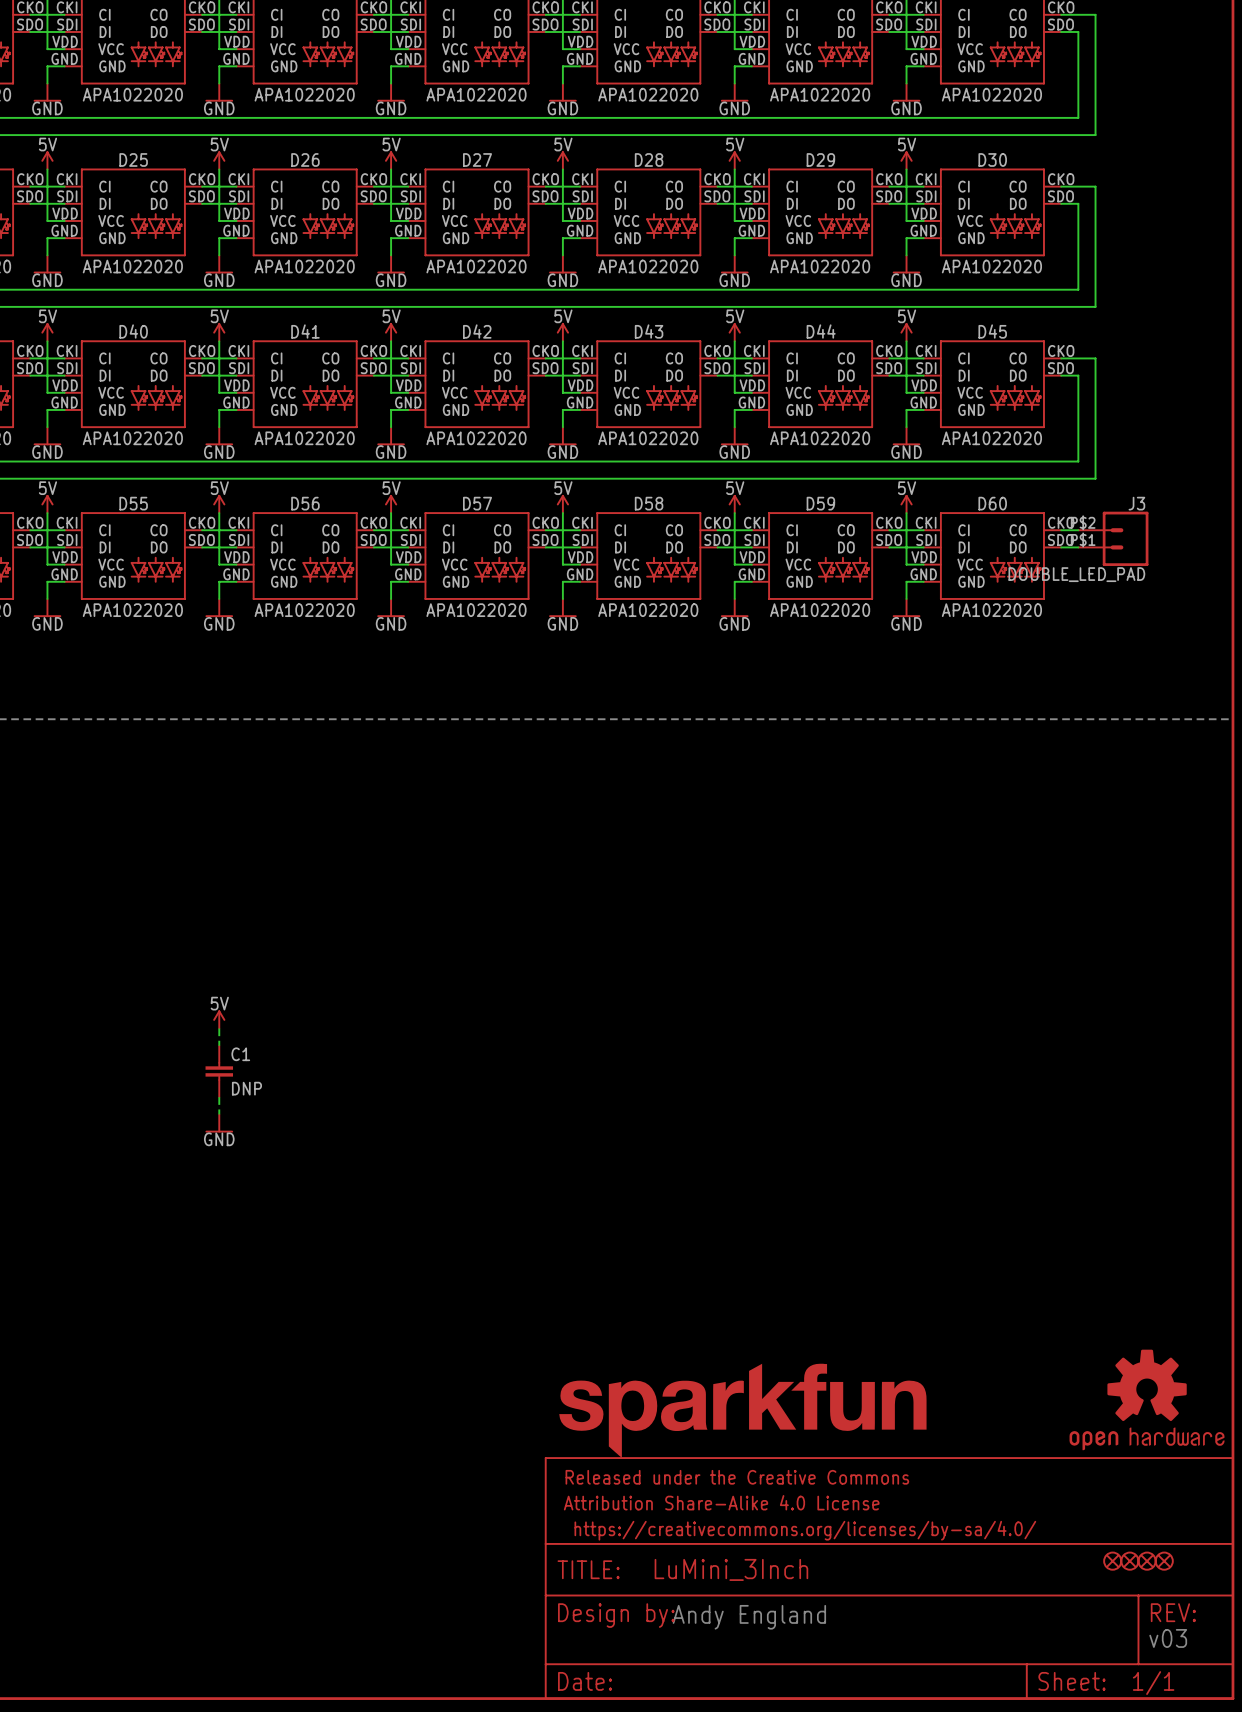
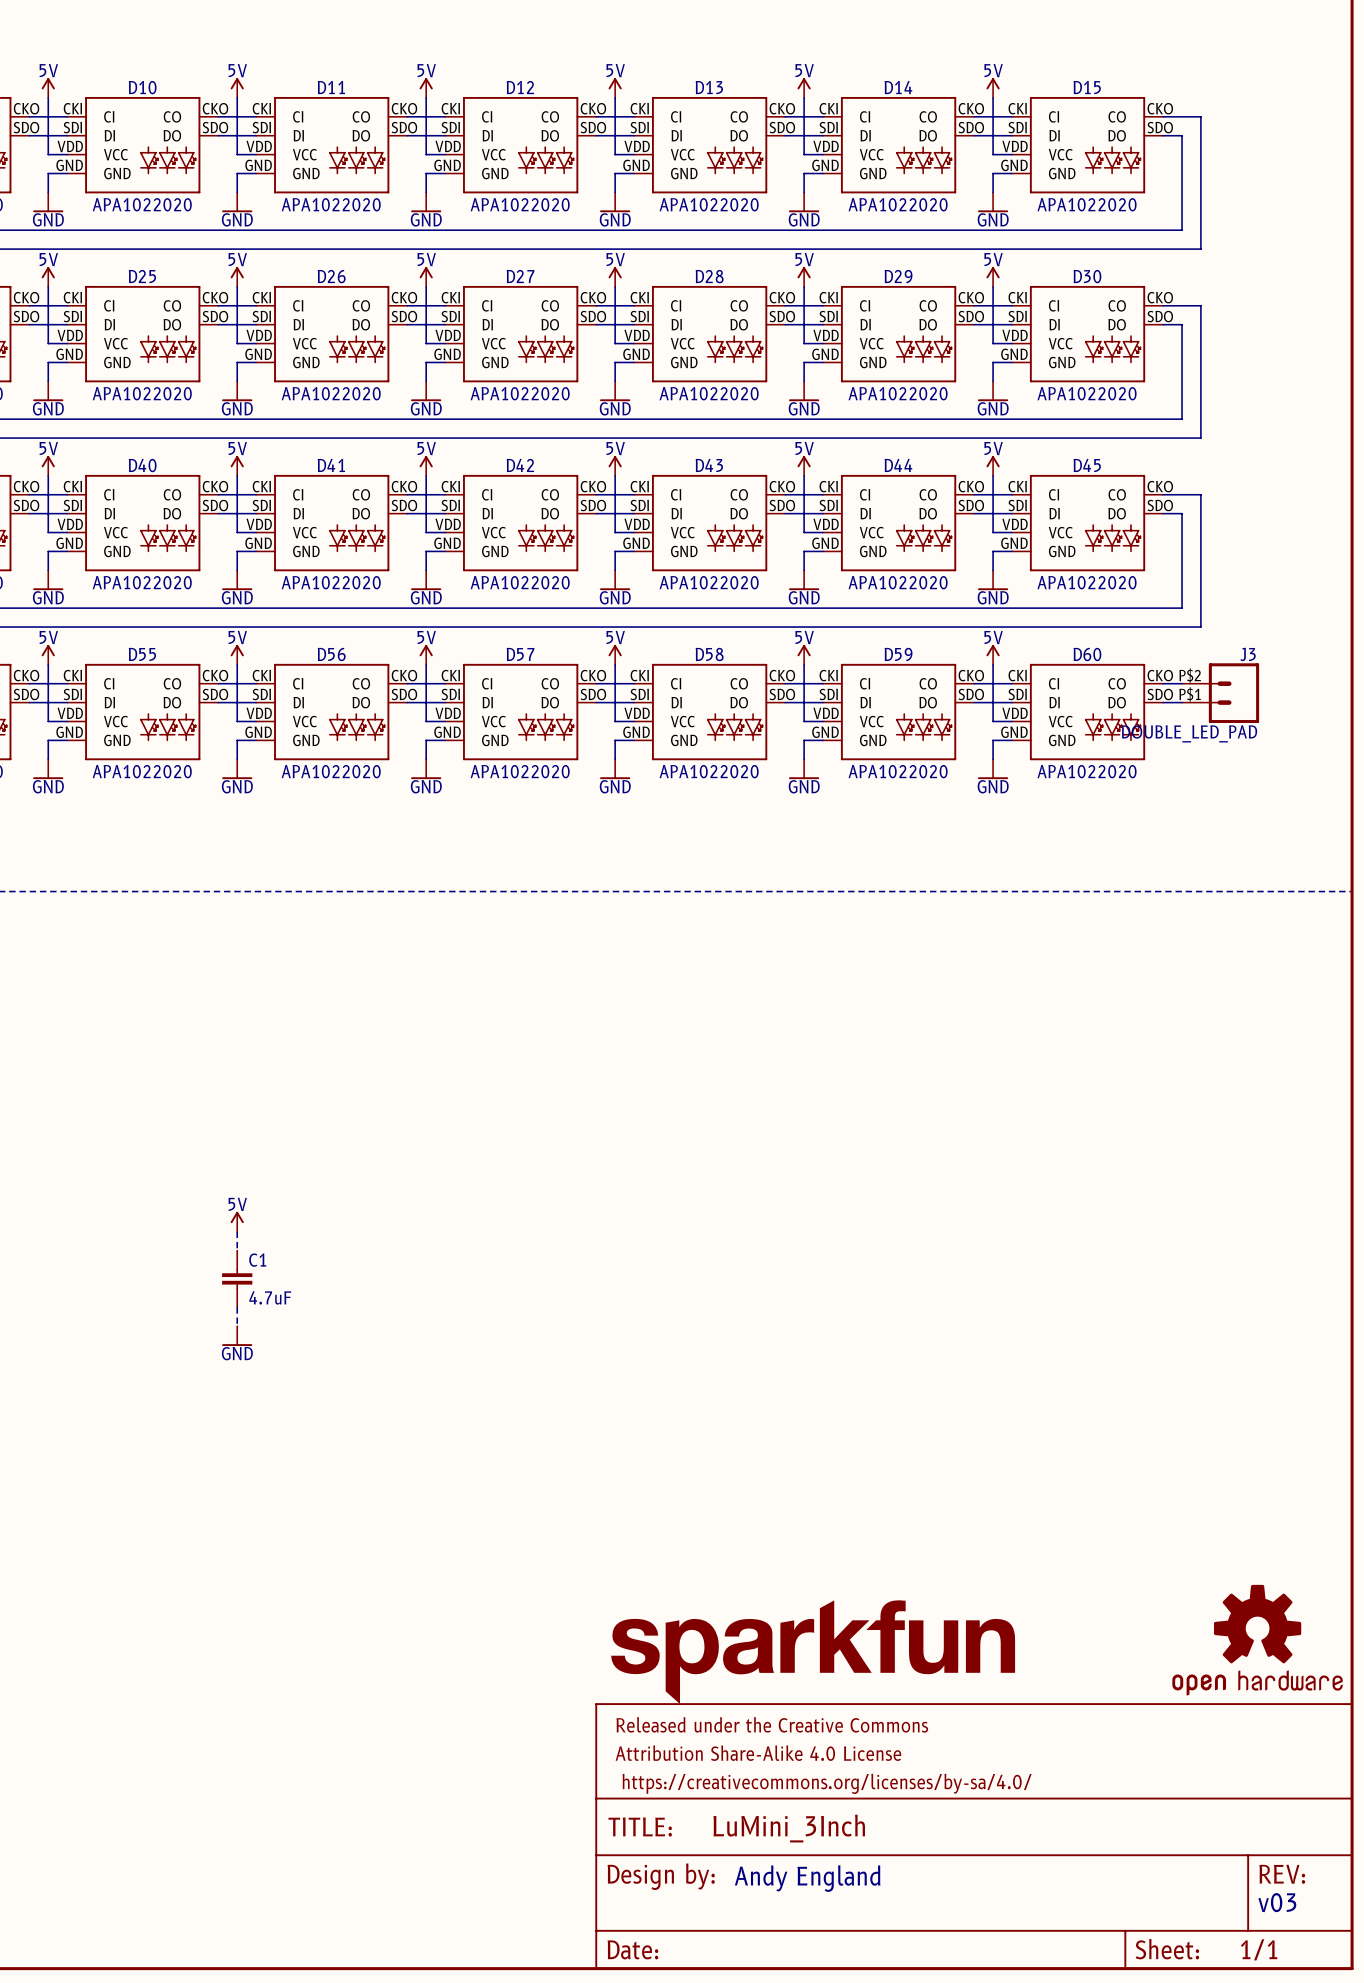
C1 value: DNP (246, 1088) -> 4.7uF (270, 1297)
part: (1112, 1561) -> none
part: (1129, 1561) -> none
part: (1147, 1561) -> none
part: (1164, 1561) -> none

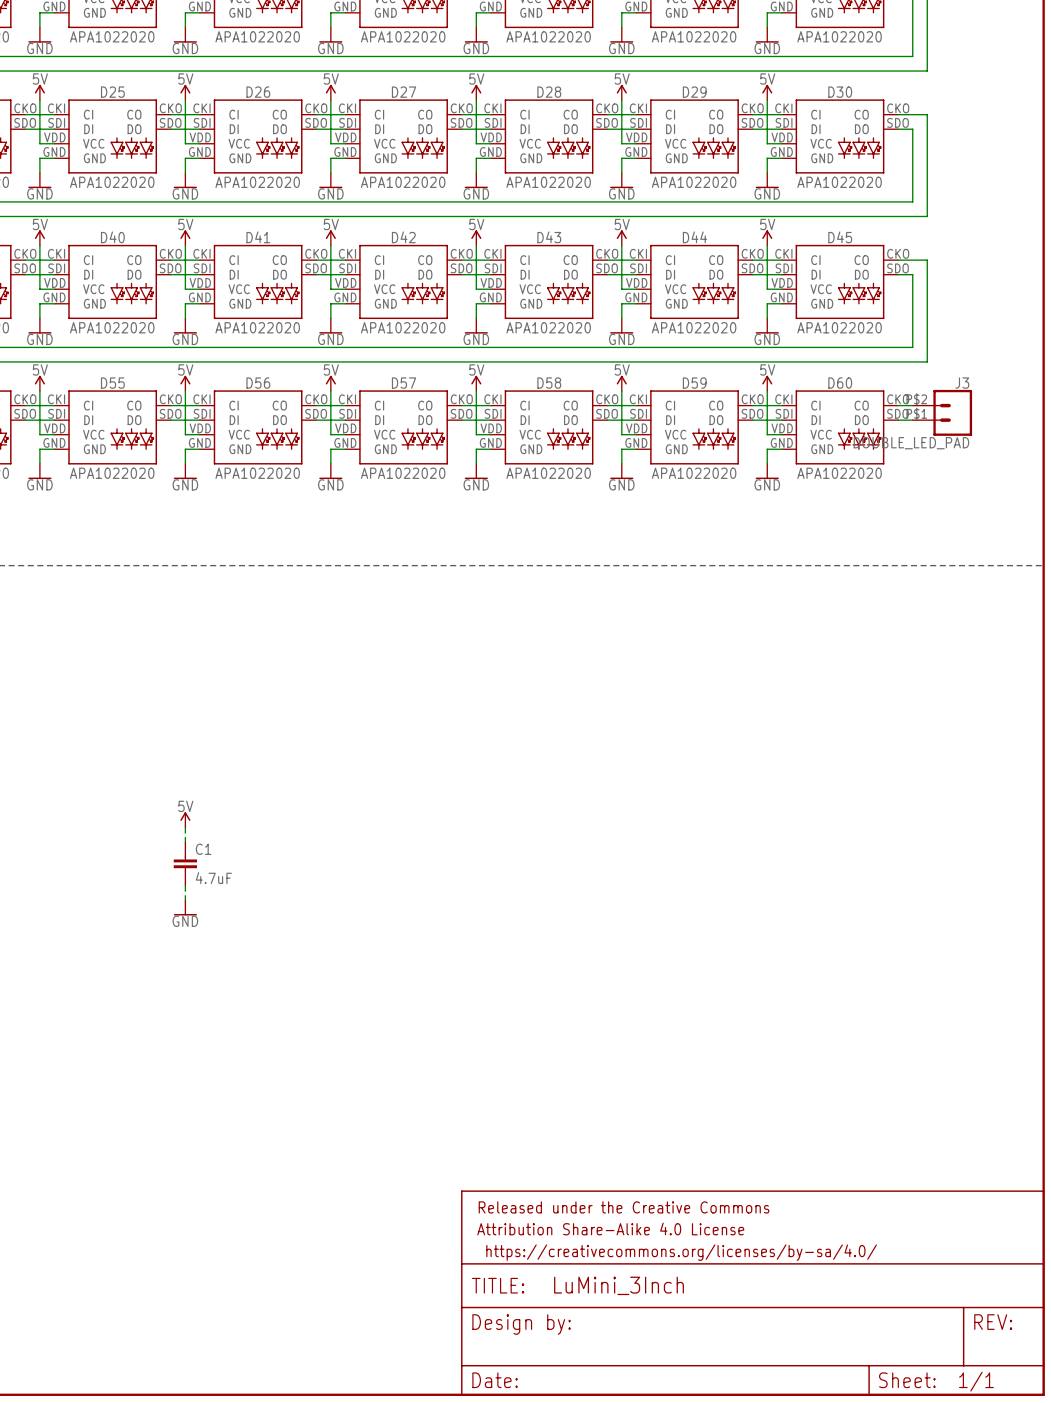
part: (1257, 1640) -> none
part: (813, 1652) -> none
text: Andy England (807, 1878) -> none
text: v03 (1277, 1902) -> none

